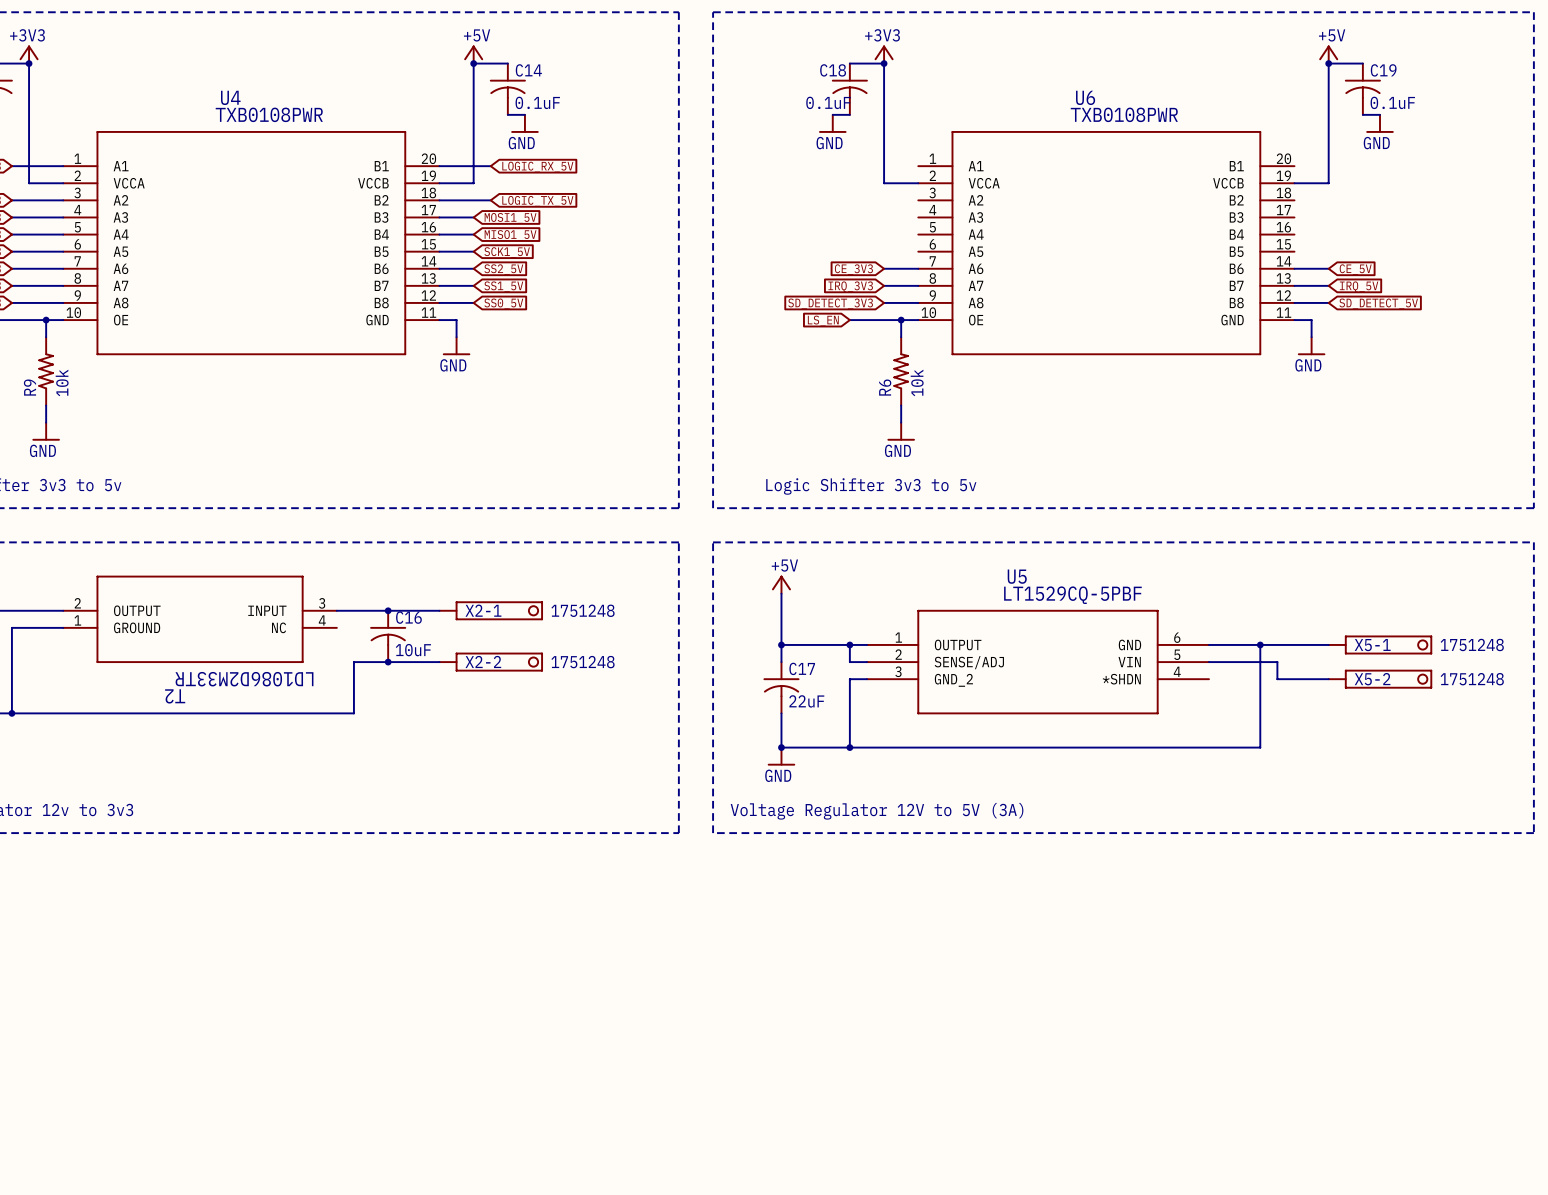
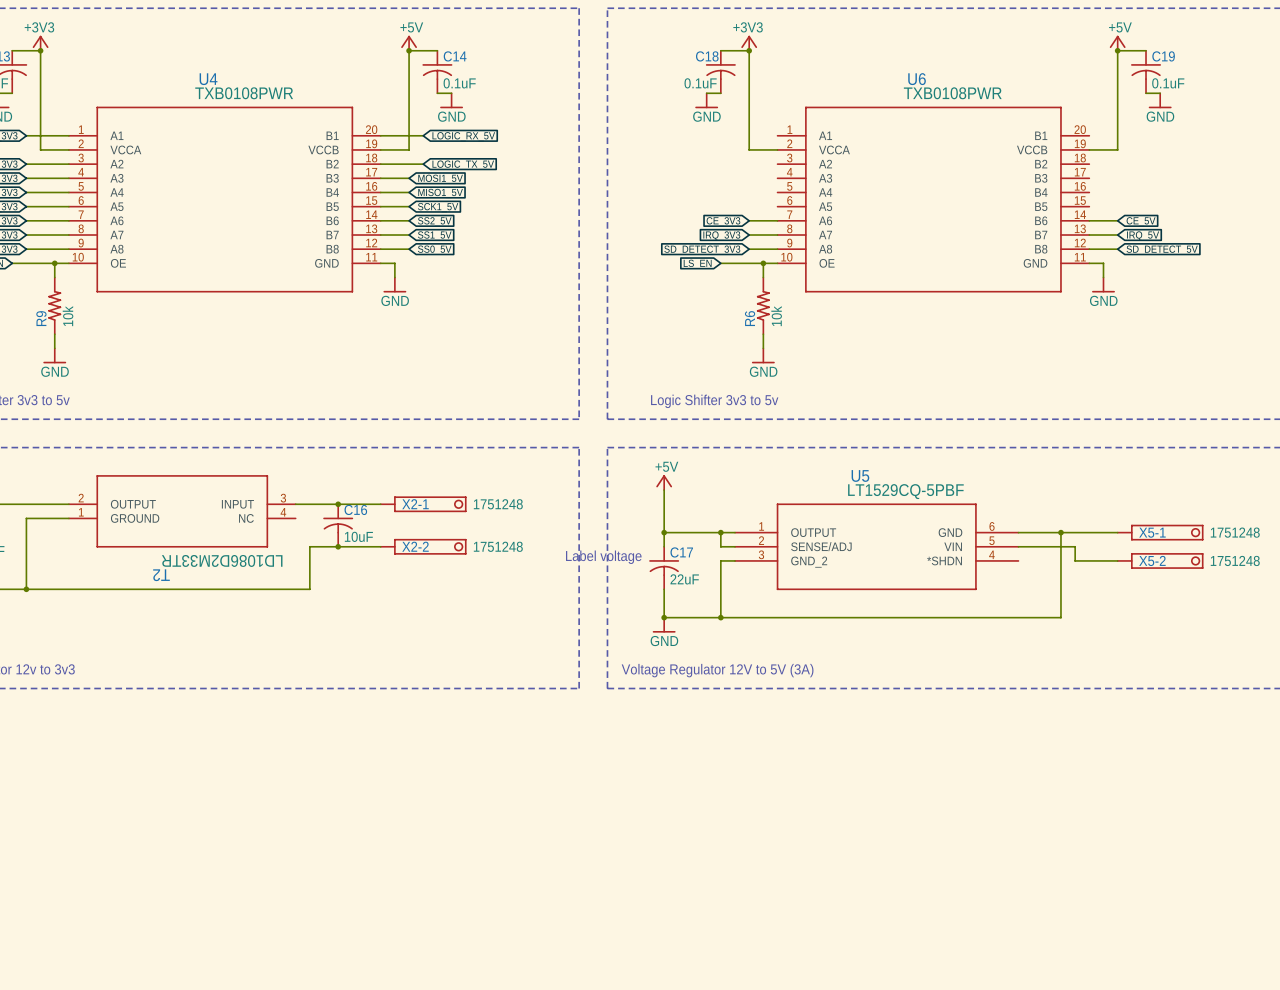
text: none -> Label voltage (603, 557)

